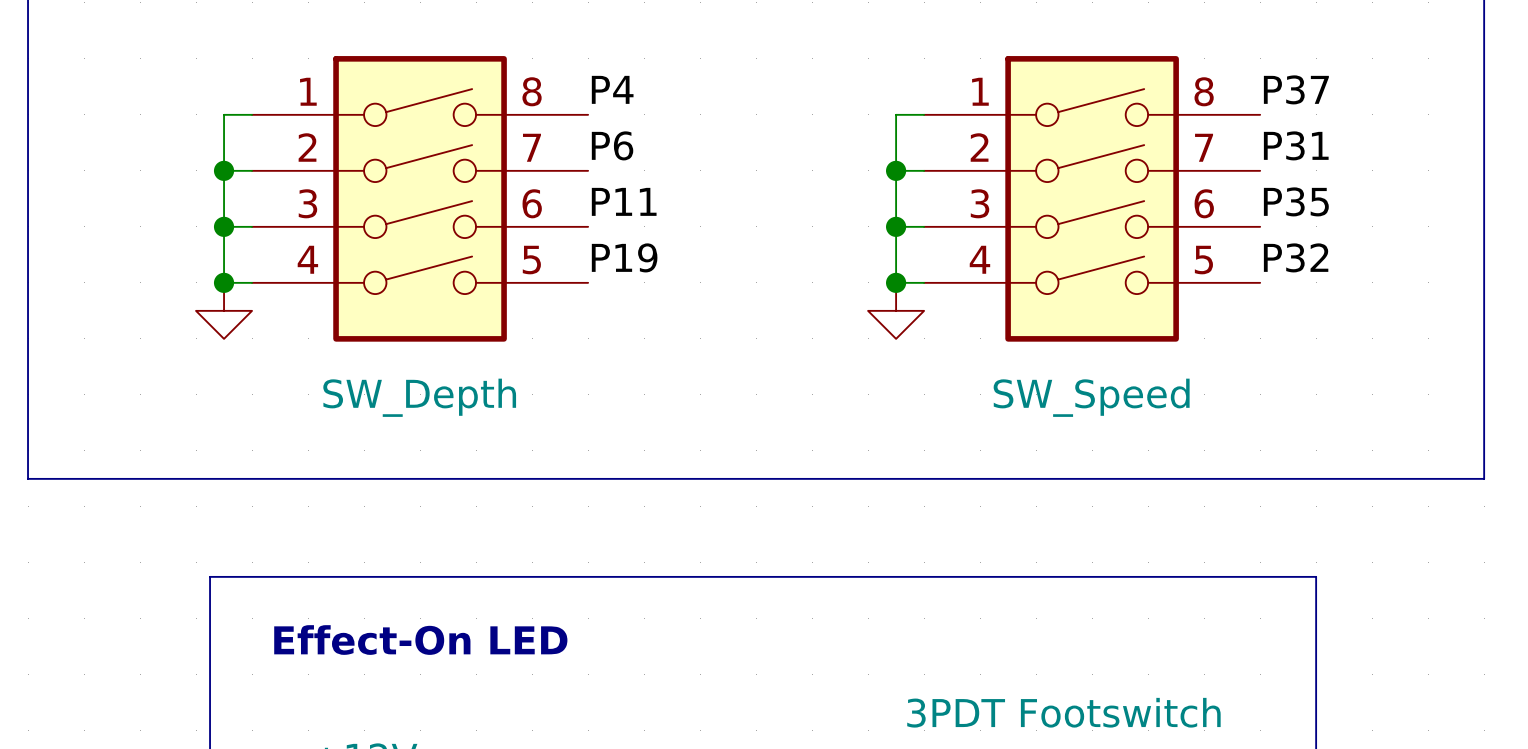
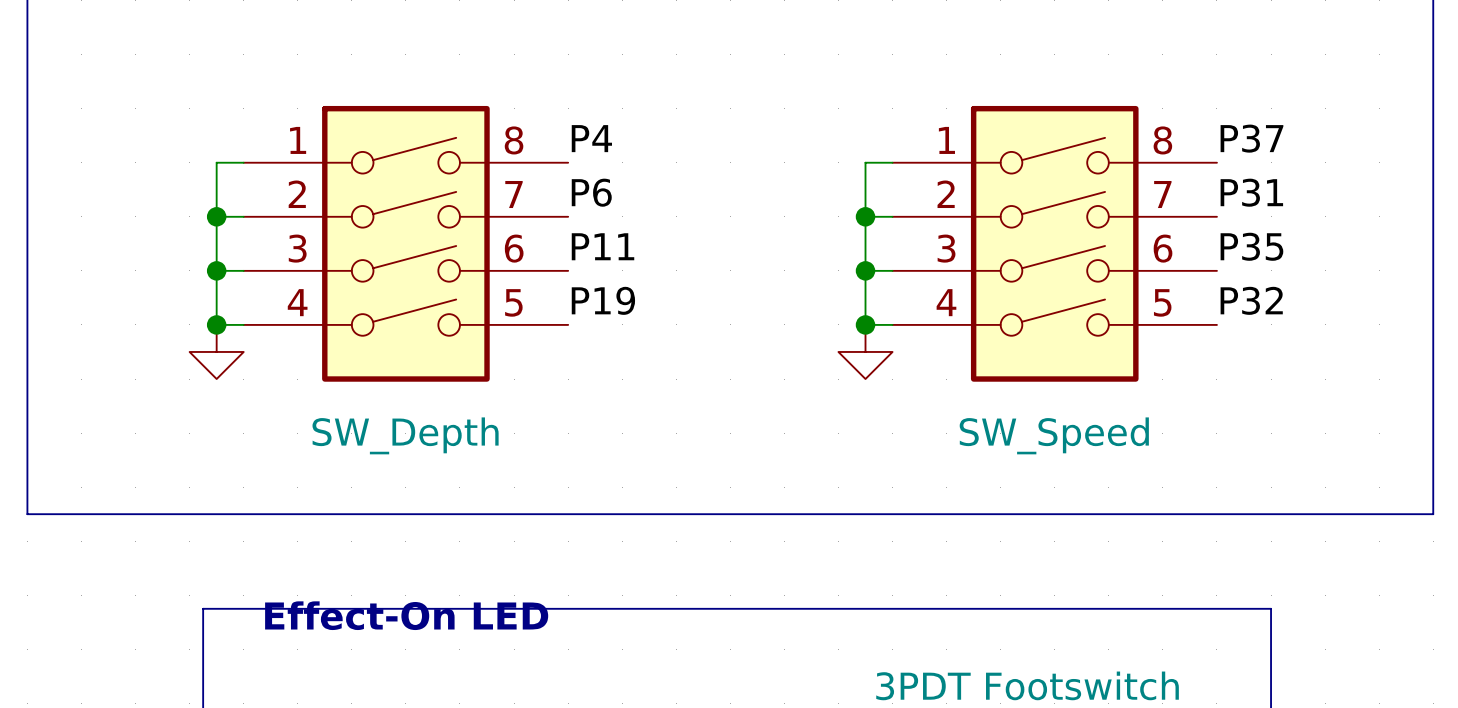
label: P4 (612, 89) -> none
label: P37 (1296, 89) -> none
wire: (252, 114) (224, 114) (224, 170) -> none
wire: (924, 114) (896, 114) (896, 170) -> none
label: P6 (612, 145) -> P4 (591, 138)
label: P31 (1296, 145) -> P37 (1251, 138)
junction: (224, 170) -> none
junction: (896, 170) -> none
part position: (420, 198) -> (405, 243)
part position: (1092, 198) -> (1054, 243)
label: P11 (624, 201) -> P6 (591, 192)
label: P35 (1296, 201) -> P31 (1251, 192)
label: P19 (624, 257) -> P11 (603, 246)
label: P32 (1296, 257) -> P35 (1251, 246)
wire: none -> (216, 270) (216, 324) (243, 324)
wire: none -> (865, 270) (865, 324) (892, 324)
power symbol position: (224, 310) -> (216, 351)
power symbol position: (896, 310) -> (865, 351)
label: none -> P19 (603, 300)
label: none -> P32 (1251, 300)
junction: none -> (216, 324)
junction: none -> (865, 324)
line: (28, 478) (1484, 478) -> (27, 460) (27, 514) (1433, 514) (1433, 460)
line: (210, 632) (210, 576) (1316, 576) (1316, 632) -> (203, 608) (1271, 608)

